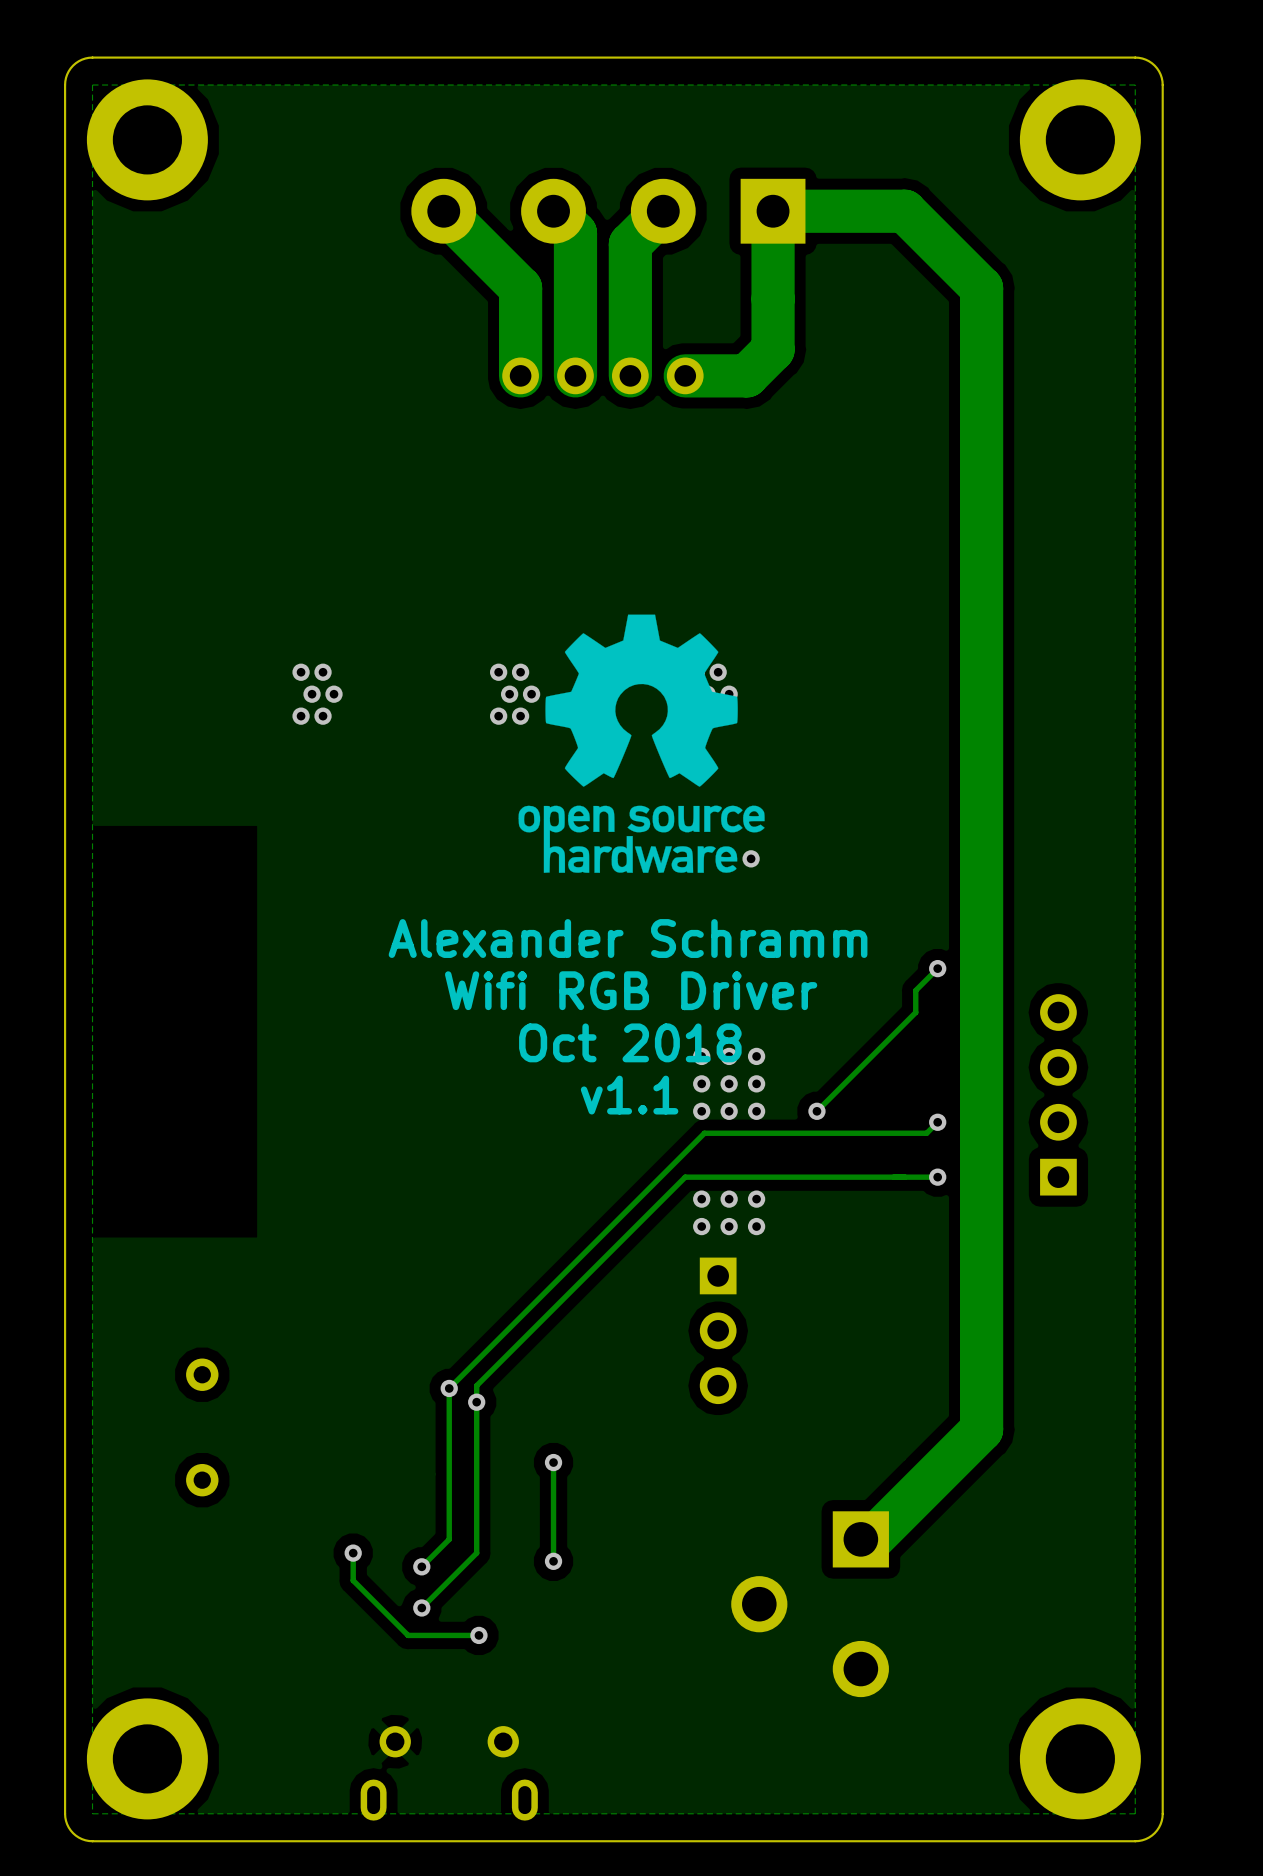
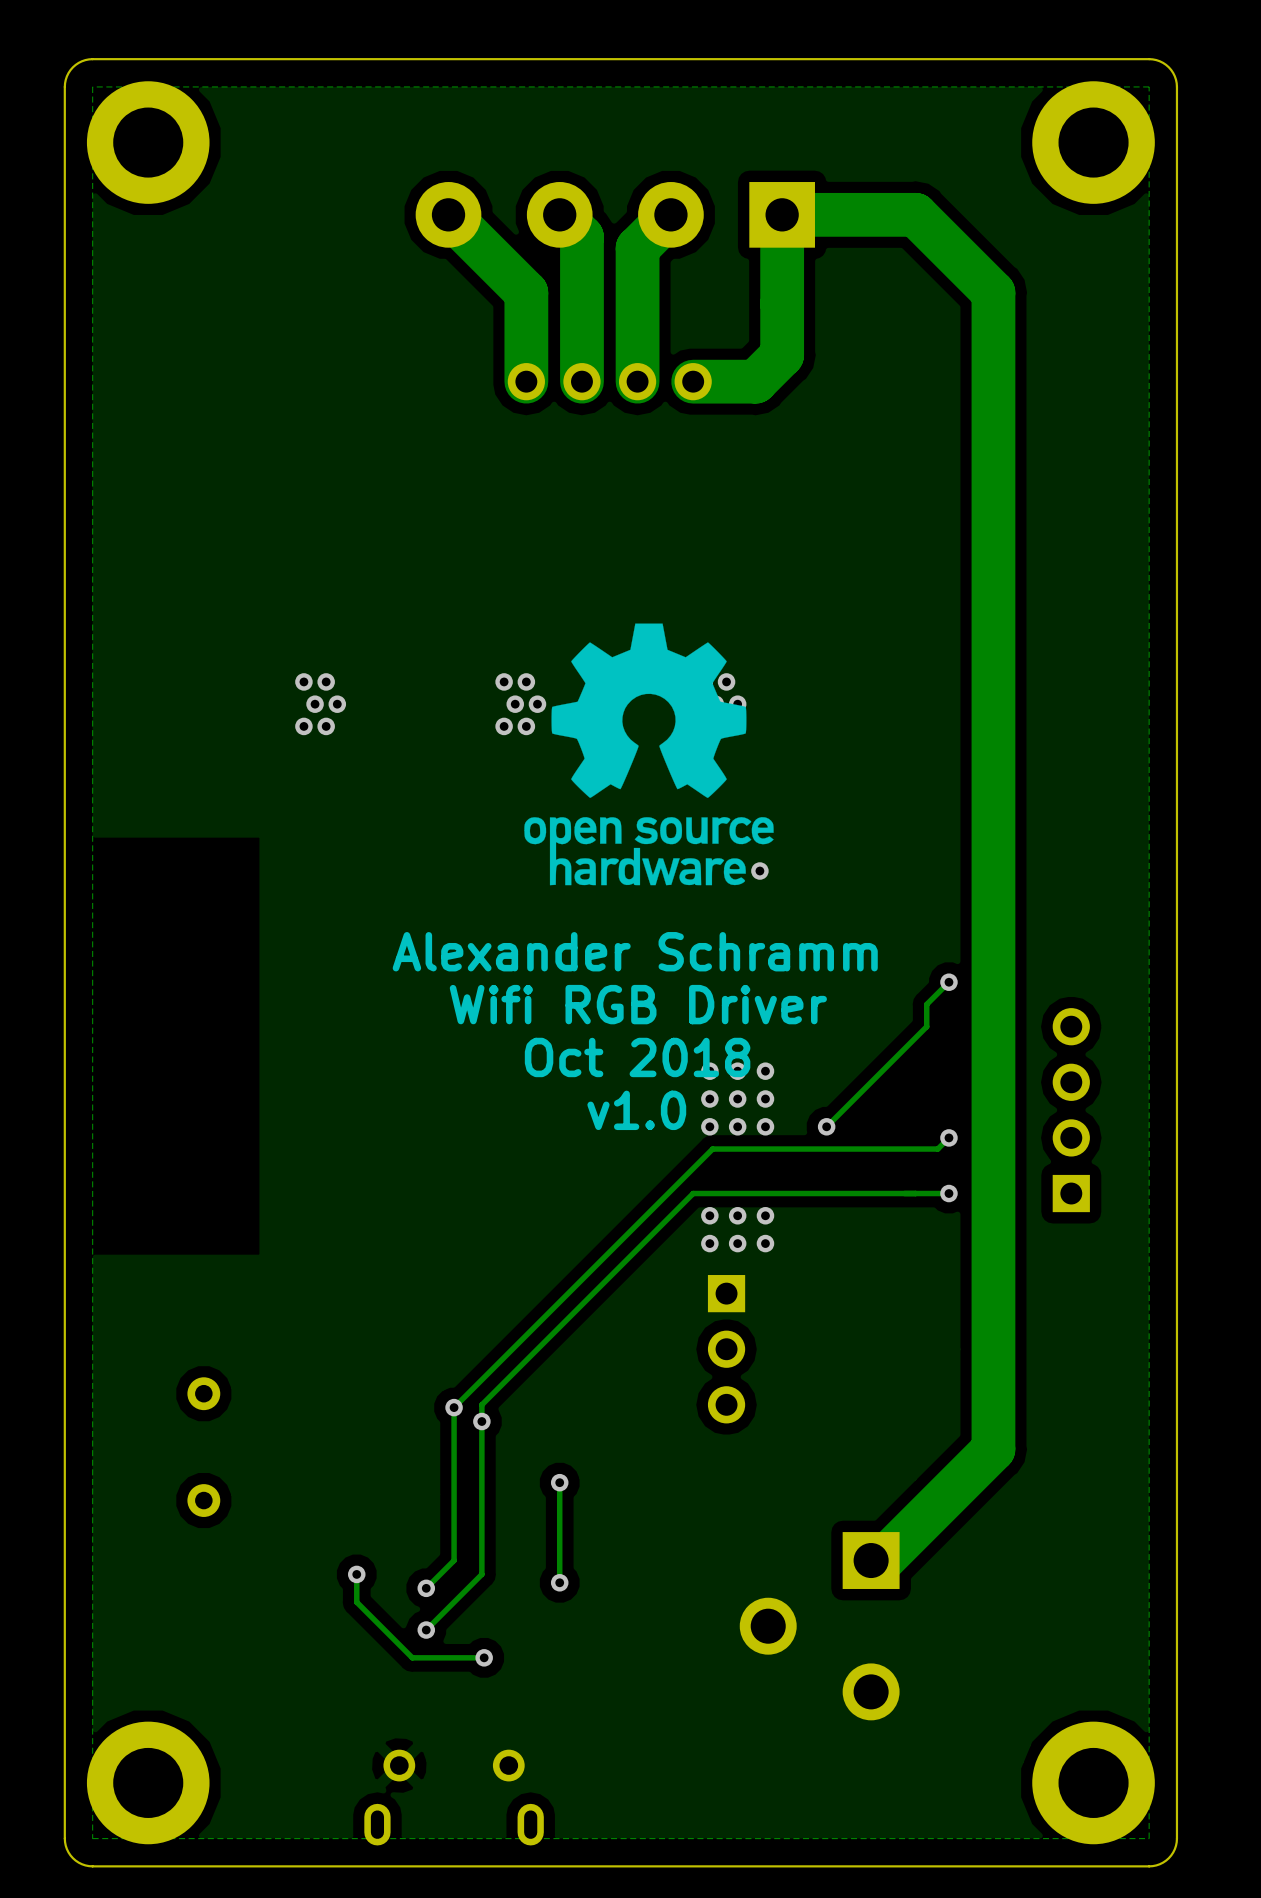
text: v1.1 (629, 1095) -> v1.0 (636, 1110)

